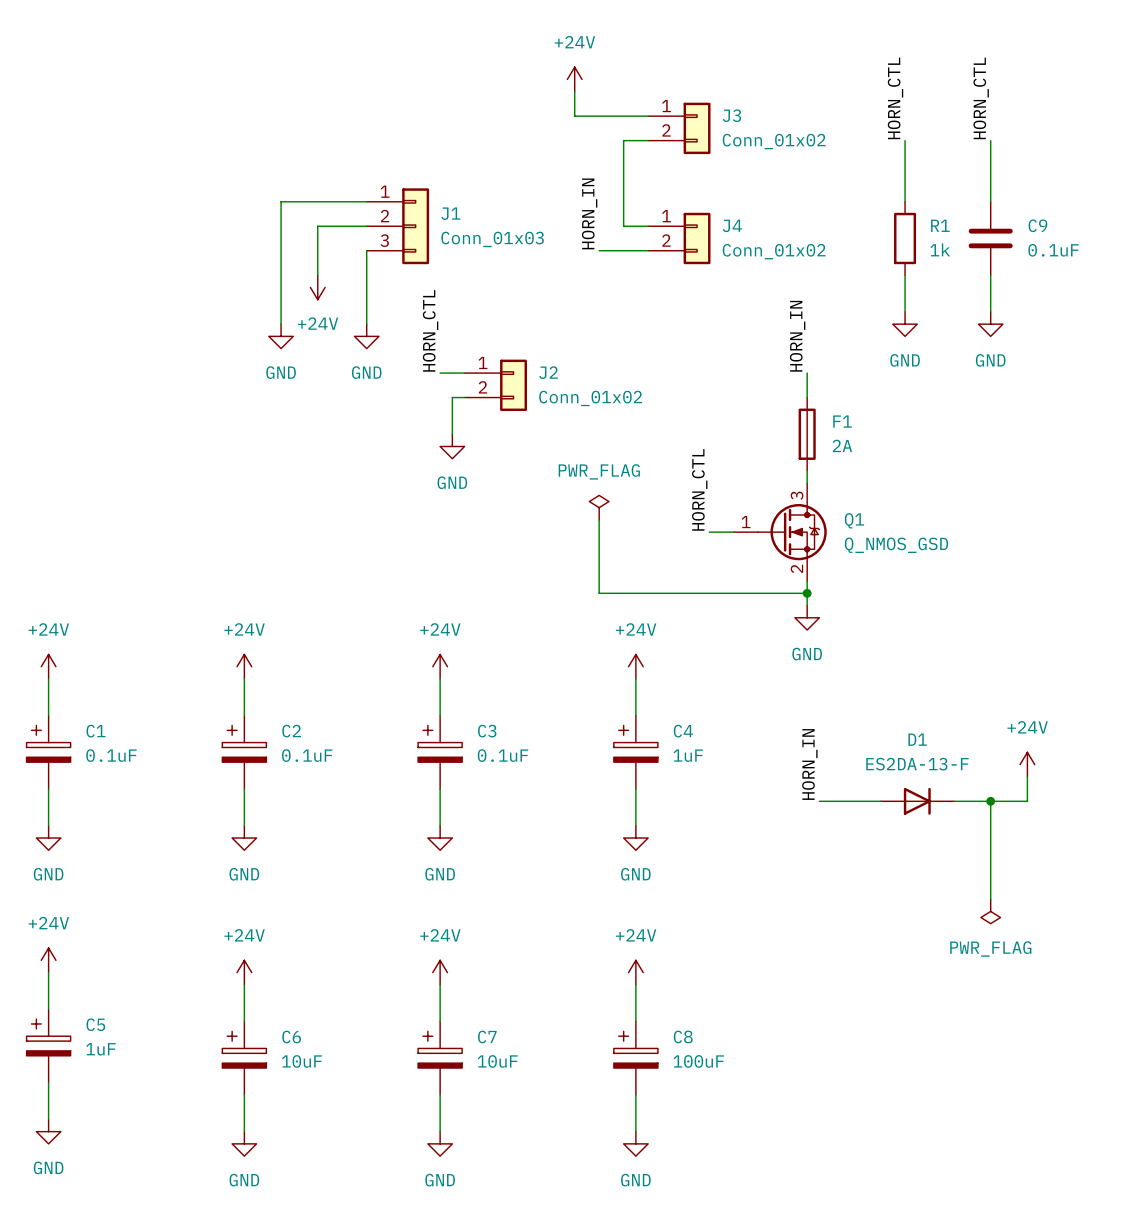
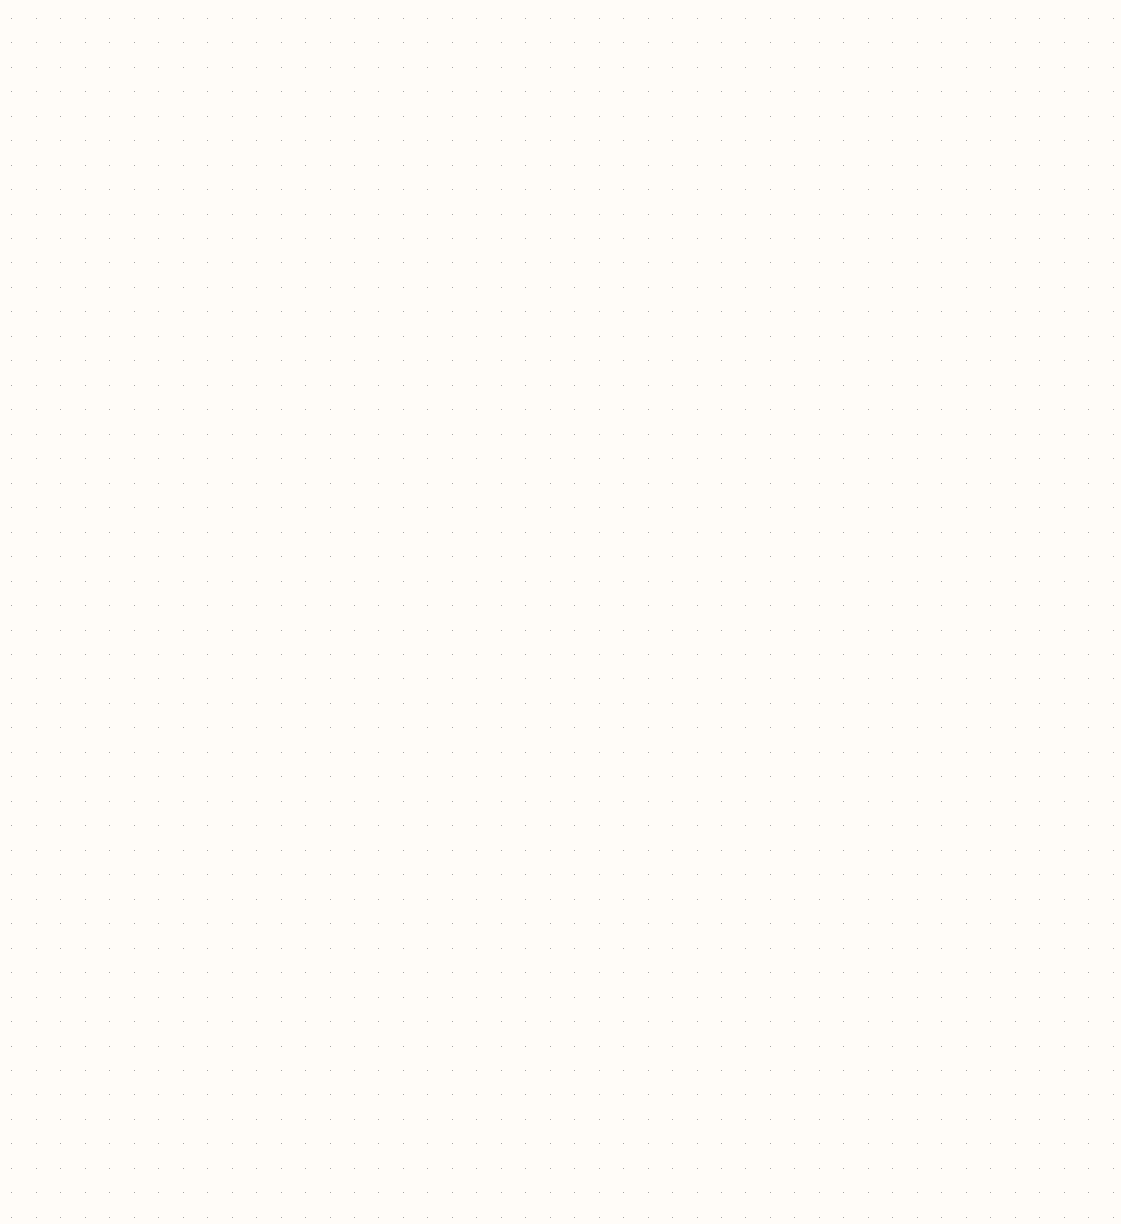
power symbol: +24V (574, 79) -> none
wire: (574, 91) (574, 116) (648, 116) -> none
label: HORN_CTL (895, 98) -> none
label: HORN_CTL (981, 98) -> none
J3: Conn_01x02 (679, 128) -> none
wire: (648, 140) (623, 140) (623, 226) (648, 226) -> none
wire: (905, 140) (905, 201) -> none
wire: (990, 140) (990, 201) -> none
wire: (366, 201) (281, 201) (281, 324) -> none
label: HORN_IN (589, 213) -> none
wire: (366, 226) (317, 226) (317, 275) -> none
J1: Conn_01x03 (397, 226) -> none
J4: Conn_01x02 (679, 238) -> none
R1: 1k (905, 238) -> none
C9: 0.1uF (990, 238) -> none
wire: (366, 250) (366, 324) -> none
wire: (599, 250) (648, 250) -> none
wire: (905, 275) (905, 311) -> none
wire: (990, 275) (990, 311) -> none
power symbol: +24V (317, 287) -> none
power symbol: GND (905, 324) -> none
power symbol: GND (990, 324) -> none
label: HORN_CTL (430, 330) -> none
power symbol: GND (281, 336) -> none
power symbol: GND (366, 336) -> none
label: HORN_IN (797, 336) -> none
wire: (440, 373) (464, 373) -> none
wire: (807, 373) (807, 397) -> none
J2: Conn_01x02 (495, 385) -> none
wire: (464, 397) (452, 397) (452, 434) -> none
F1: 2A (807, 434) -> none
power symbol: GND (452, 446) -> none
wire: (807, 470) (807, 483) -> none
label: HORN_CTL (699, 489) -> none
power symbol: PWR_FLAG (599, 507) -> none
wire: (599, 519) (599, 593) (807, 593) -> none
wire: (709, 532) (733, 532) -> none
Q1: Q_NMOS_GSD (780, 532) -> none
wire: (807, 581) (807, 605) -> none
junction: (807, 593) -> none
power symbol: GND (807, 617) -> none
power symbol: +24V (48, 666) -> none
power symbol: +24V (244, 666) -> none
power symbol: +24V (440, 666) -> none
power symbol: +24V (635, 666) -> none
wire: (48, 678) (48, 715) -> none
wire: (244, 678) (244, 715) -> none
wire: (440, 678) (440, 715) -> none
wire: (635, 678) (635, 715) -> none
C1: 0.1uF (48, 752) -> none
C2: 0.1uF (244, 752) -> none
C3: 0.1uF (440, 752) -> none
C4: 1uF (635, 752) -> none
label: HORN_IN (809, 764) -> none
power symbol: +24V (1027, 764) -> none
wire: (1027, 776) (1027, 801) (953, 801) -> none
wire: (48, 789) (48, 825) -> none
wire: (244, 789) (244, 825) -> none
wire: (440, 789) (440, 825) -> none
wire: (635, 789) (635, 825) -> none
wire: (819, 801) (880, 801) -> none
D1: ES2DA-13-F (917, 801) -> none
wire: (990, 801) (990, 899) -> none
junction: (990, 801) -> none
power symbol: GND (48, 838) -> none
power symbol: GND (244, 838) -> none
power symbol: GND (440, 838) -> none
power symbol: GND (635, 838) -> none
power symbol: PWR_FLAG (990, 911) -> none
power symbol: +24V (48, 960) -> none
wire: (48, 972) (48, 1009) -> none
power symbol: +24V (244, 972) -> none
power symbol: +24V (440, 972) -> none
power symbol: +24V (635, 972) -> none
wire: (244, 984) (244, 1021) -> none
wire: (440, 984) (440, 1021) -> none
wire: (635, 984) (635, 1021) -> none
C5: 1uF (48, 1046) -> none
C6: 10uF (244, 1058) -> none
C7: 10uF (440, 1058) -> none
C8: 100uF (635, 1058) -> none
wire: (48, 1082) (48, 1119) -> none
wire: (244, 1094) (244, 1131) -> none
wire: (440, 1094) (440, 1131) -> none
wire: (635, 1094) (635, 1131) -> none
power symbol: GND (48, 1131) -> none
power symbol: GND (244, 1143) -> none
power symbol: GND (440, 1143) -> none
power symbol: GND (635, 1143) -> none

